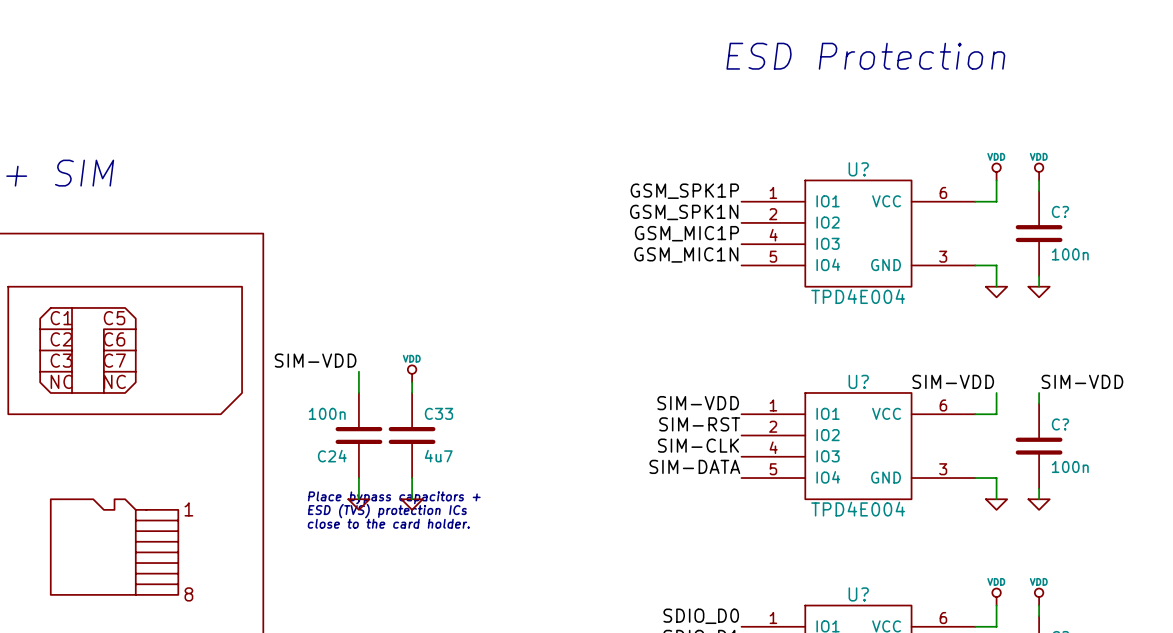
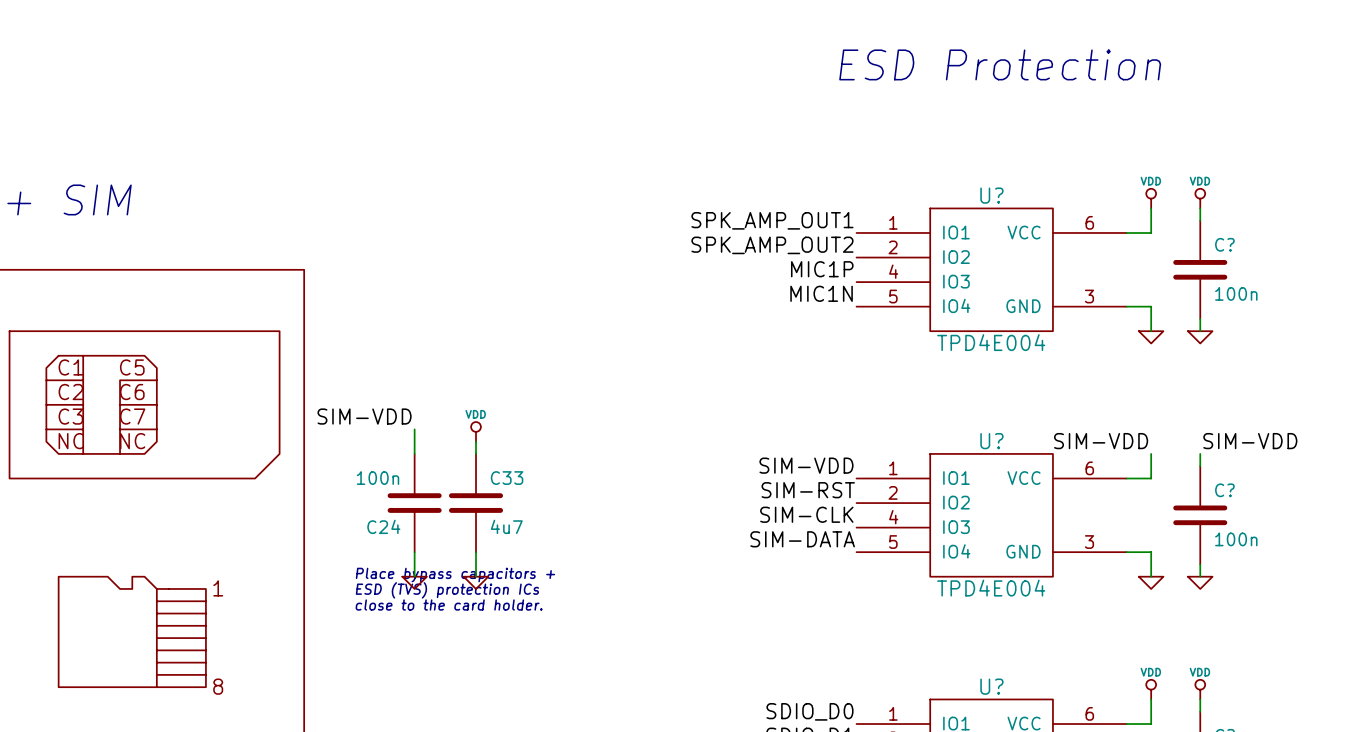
label: GSM_SPK1P (684, 191) -> SPK_AMP_OUT1 (772, 220)
label: GSM_SPK1N (684, 212) -> SPK_AMP_OUT2 (772, 245)
label: GSM_MIC1P (686, 233) -> MIC1P (822, 269)
label: GSM_MIC1N (686, 254) -> MIC1N (821, 293)

